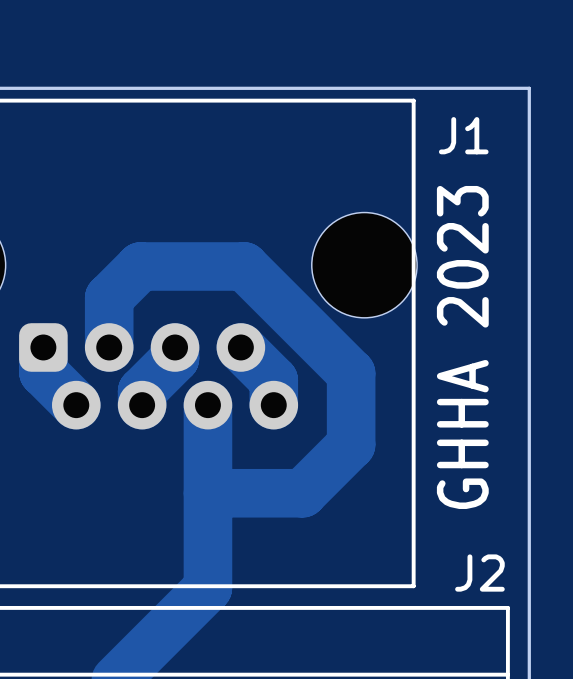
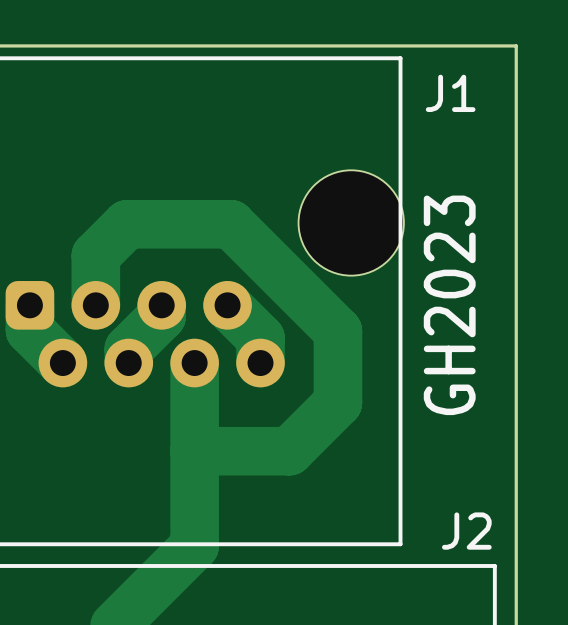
text: GHHA 2023 (462, 347) -> GH2023 (449, 305)

